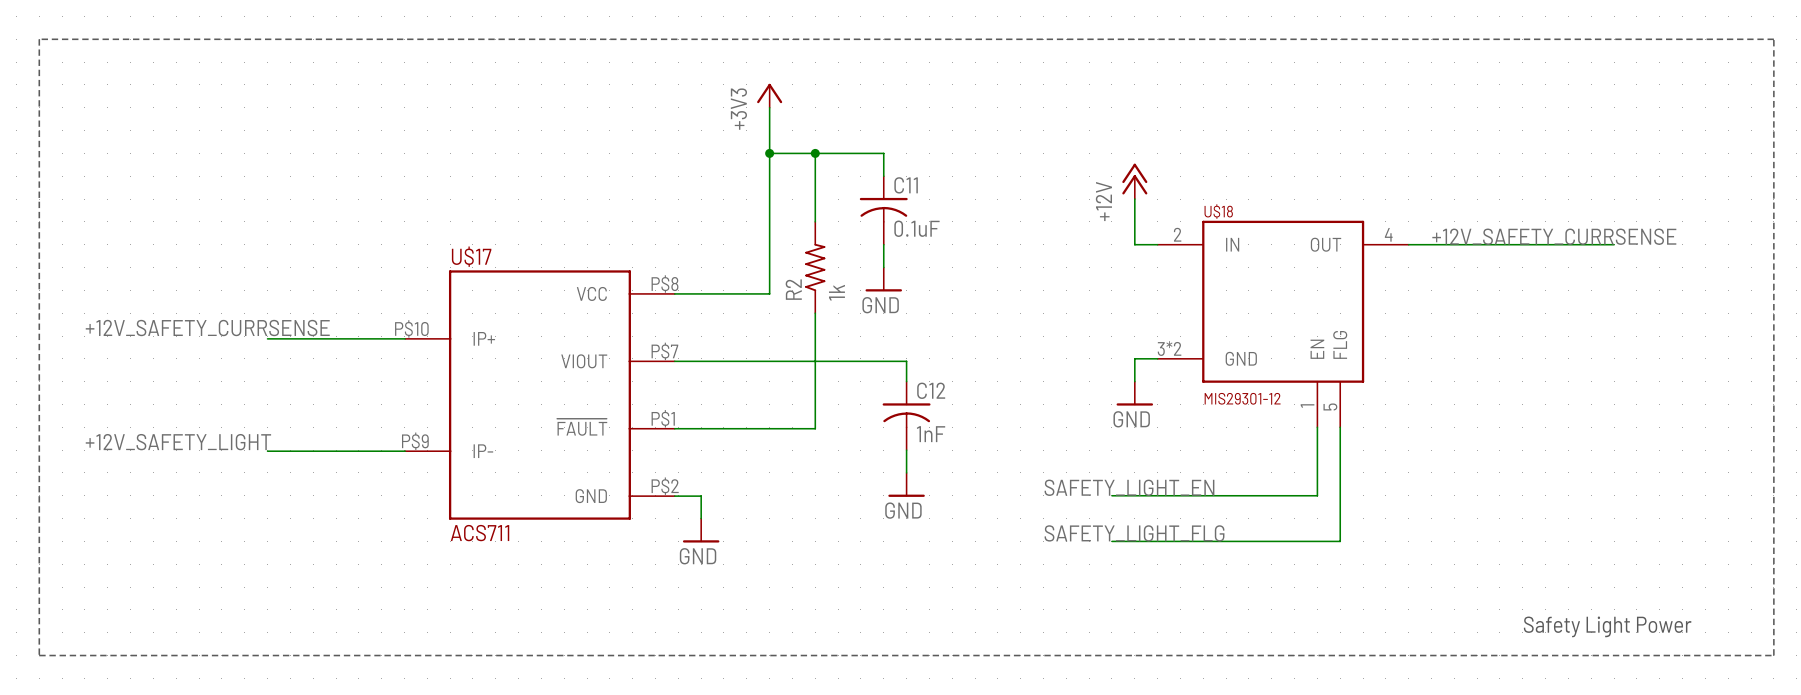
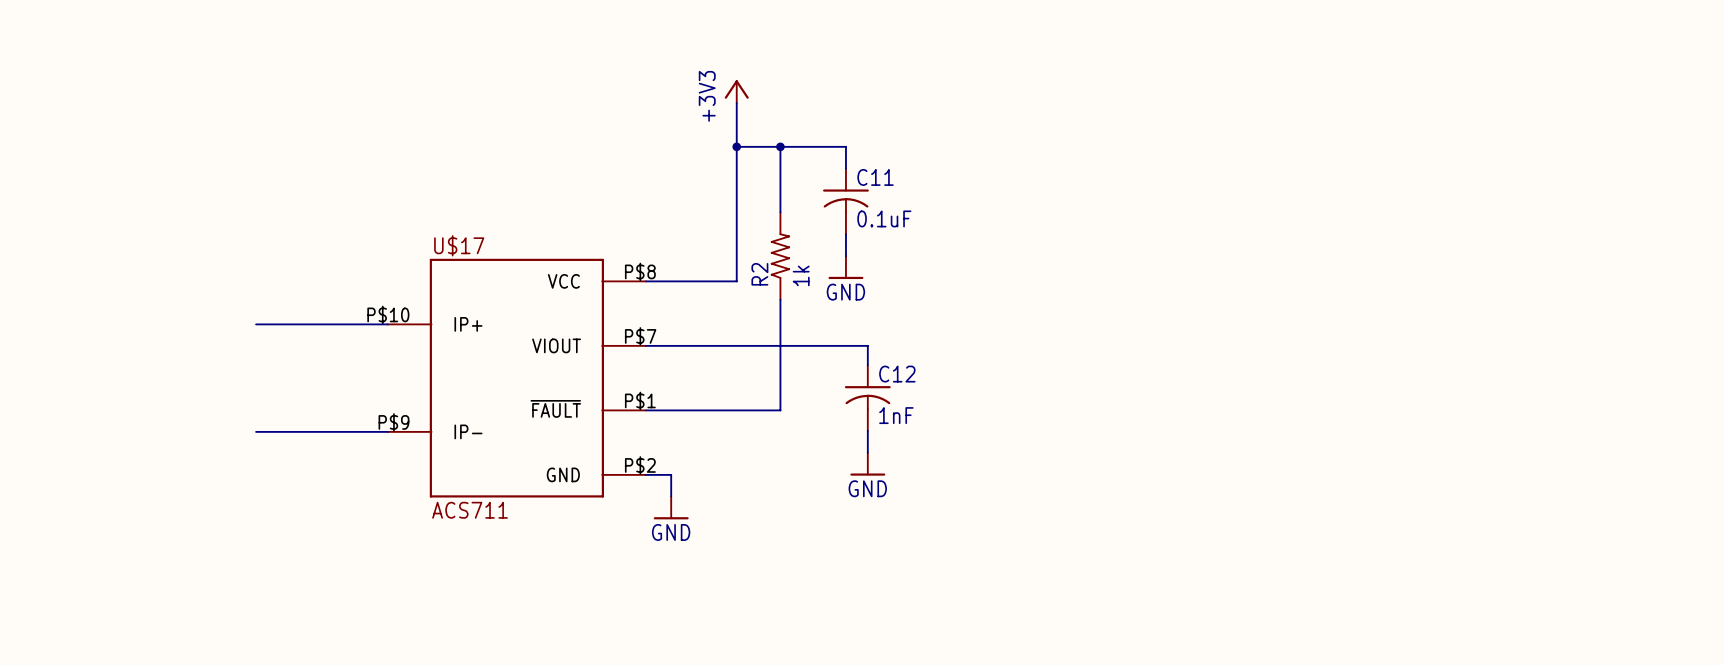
line: (39, 39) (39, 655) (1773, 655) (1773, 39) (39, 39) -> none
power symbol: +12V (1134, 181) -> none
wire: (1134, 199) (1134, 244) (1157, 244) -> none
label: +12V_SAFETY_CURRSENSE (1554, 236) -> none
wire: (1408, 244) (1614, 244) -> none
U$18: MIS29301-12 (1283, 324) -> none
label: +12V_SAFETY_CURRSENSE (207, 328) -> none
wire: (1157, 358) (1134, 358) (1134, 381) -> none
power symbol: GND (1134, 393) -> none
wire: (1317, 427) (1317, 495) (1111, 495) -> none
wire: (1340, 427) (1340, 541) (1111, 541) -> none
label: +12V_SAFETY_LIGHT (178, 442) -> none
label: SAFETY_LIGHT_EN (1129, 487) -> none
label: SAFETY_LIGHT_FLG (1134, 533) -> none
text: Safety Light Power (1607, 626) -> none

